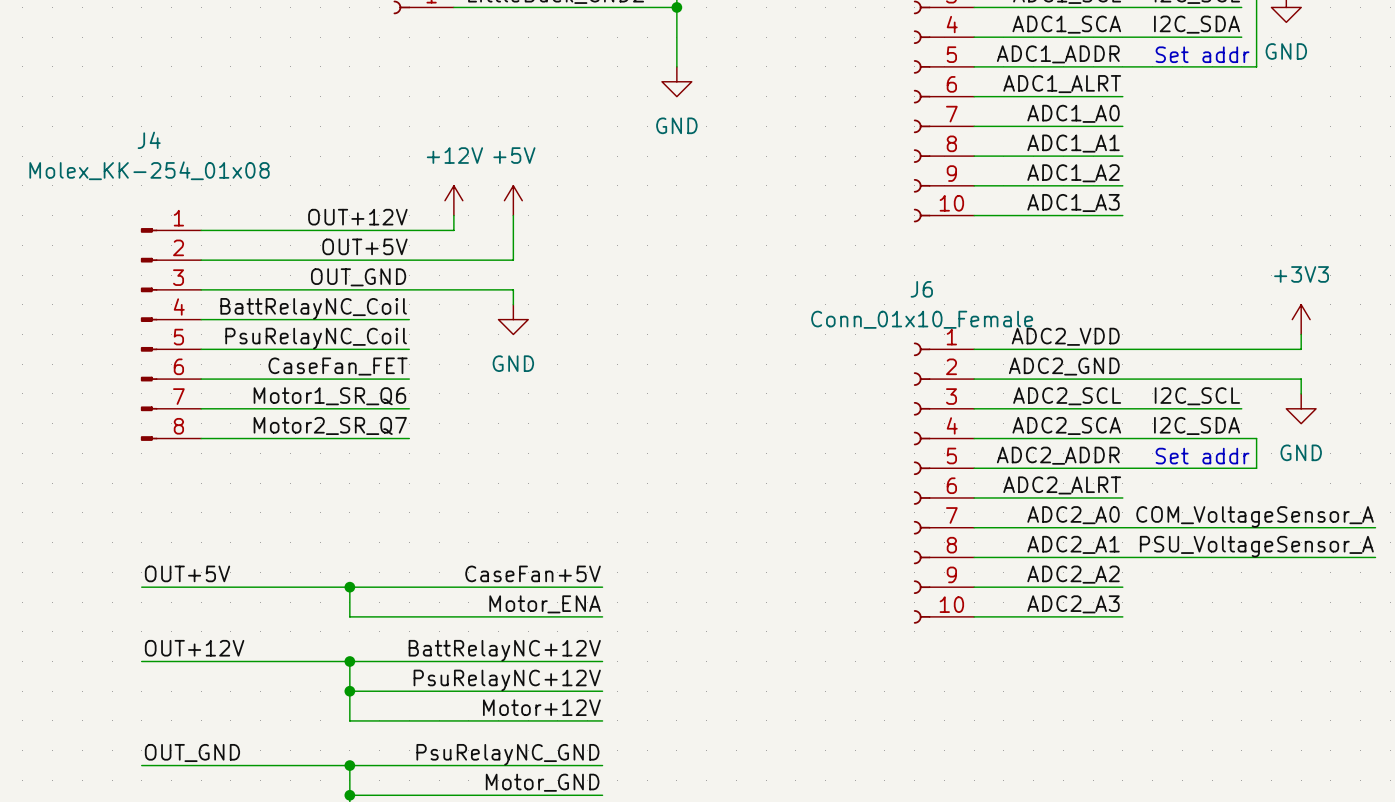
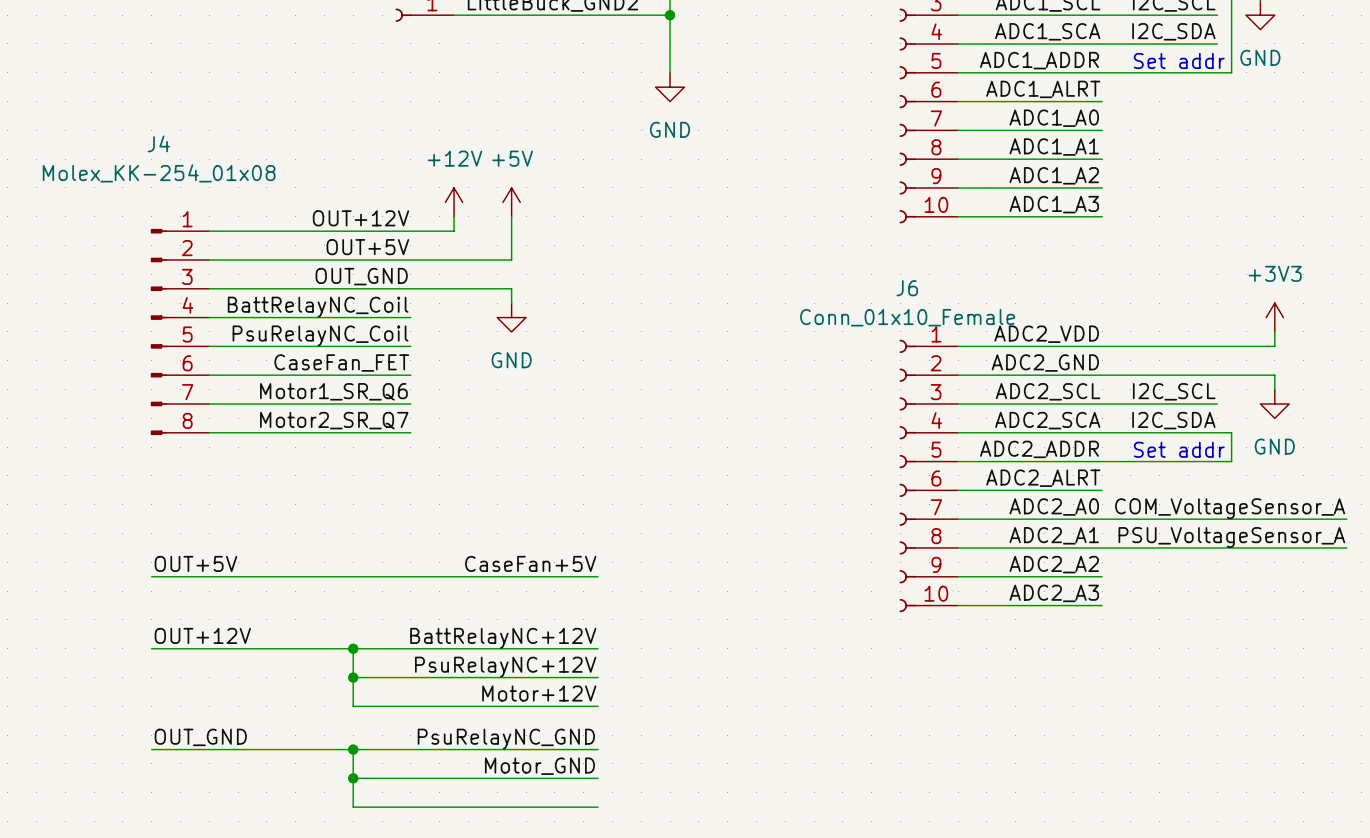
wire: (349, 587) (349, 616) (602, 616) -> none
junction: (349, 587) -> none
label: Motor_ENA (545, 604) -> none

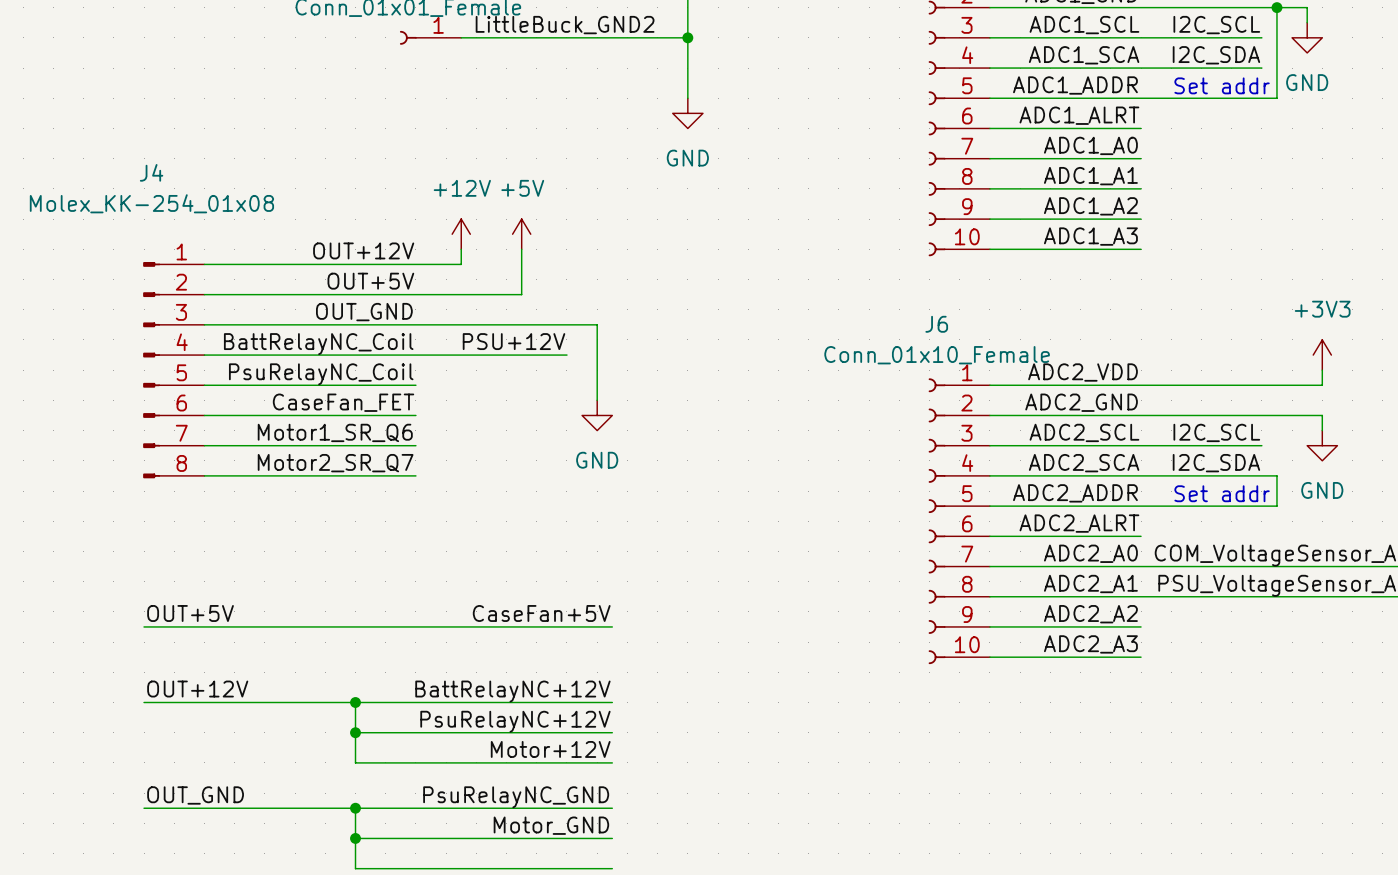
wire: (511, 288) (511, 303) -> (521, 324) (597, 324) (597, 400)
label: none -> PSU+12V (514, 341)
wire: none -> (415, 355) (566, 355)
power symbol position: GND (511, 317) -> GND (597, 415)

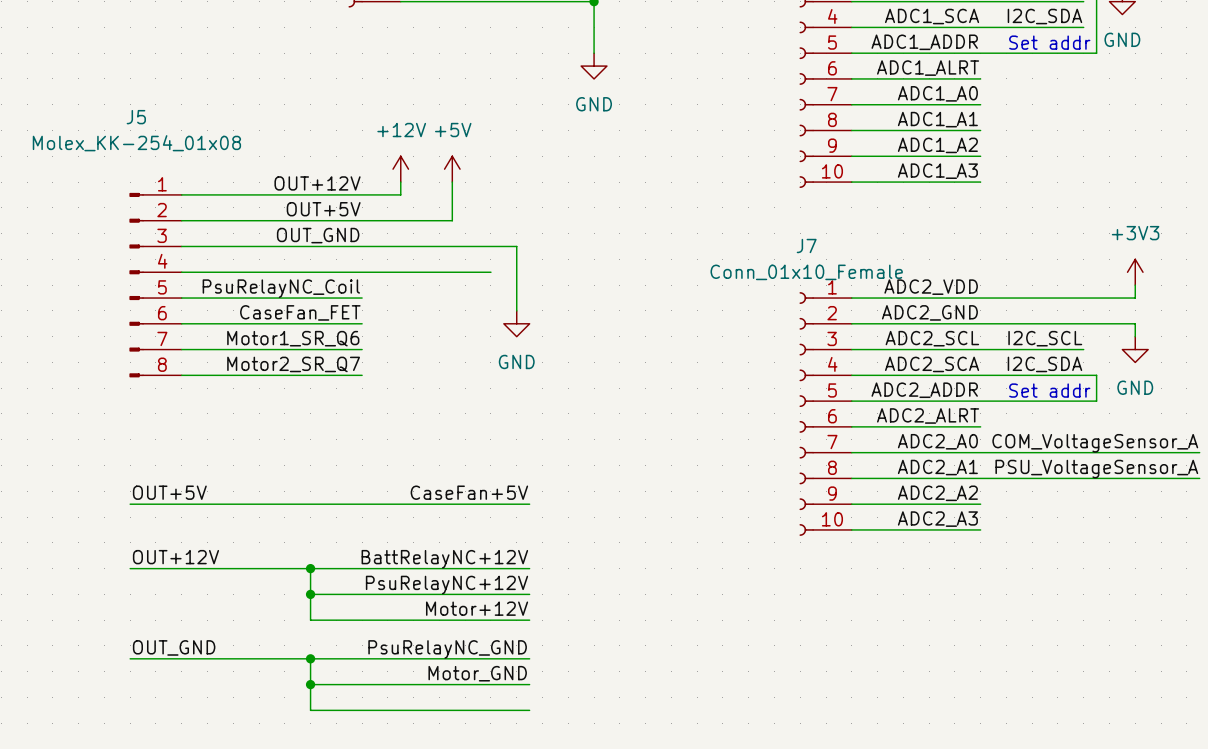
J4 name: J4 (151, 172) -> J5 (136, 117)
J6 name: J6 (936, 324) -> J7 (806, 246)
label: PSU+12V (514, 341) -> none
label: BattRelayNC_Coil (318, 344) -> none

